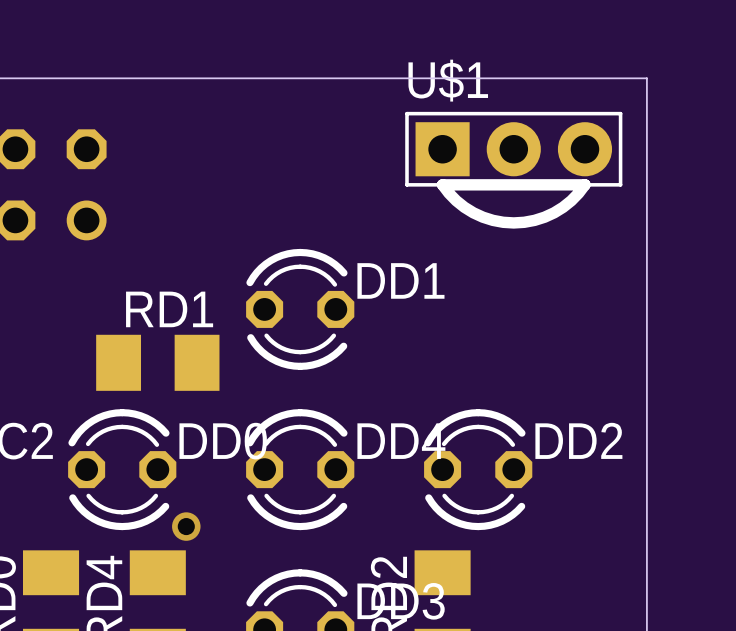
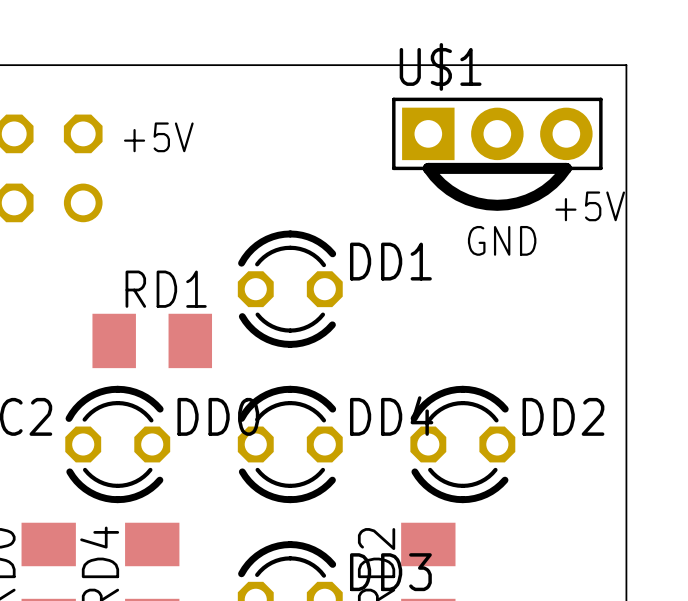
text: none -> +5V (158, 137)
text: none -> +5V (590, 206)
text: none -> GND (502, 240)
via: (186, 526) -> none

